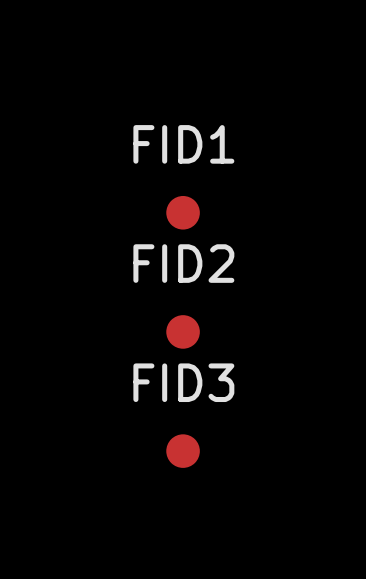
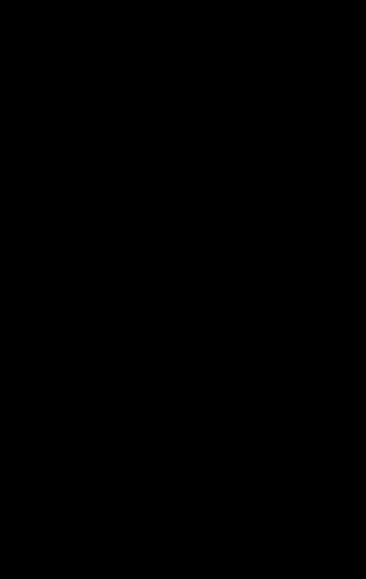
FID1: (183, 212) -> none
FID2: (183, 331) -> none
FID3: (183, 451) -> none

